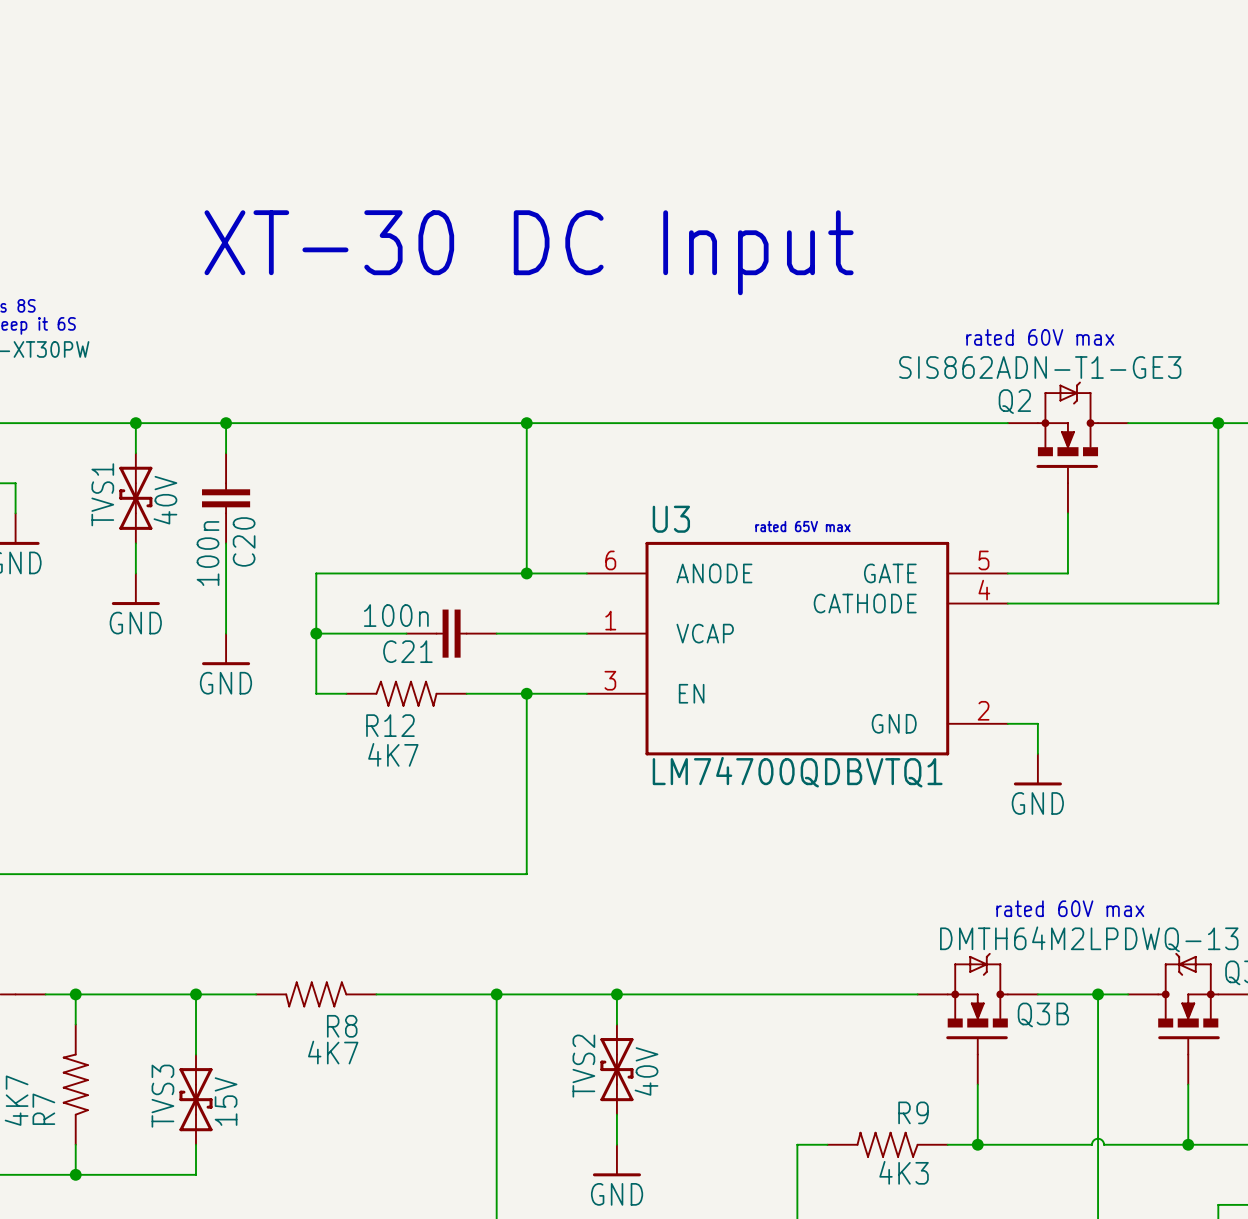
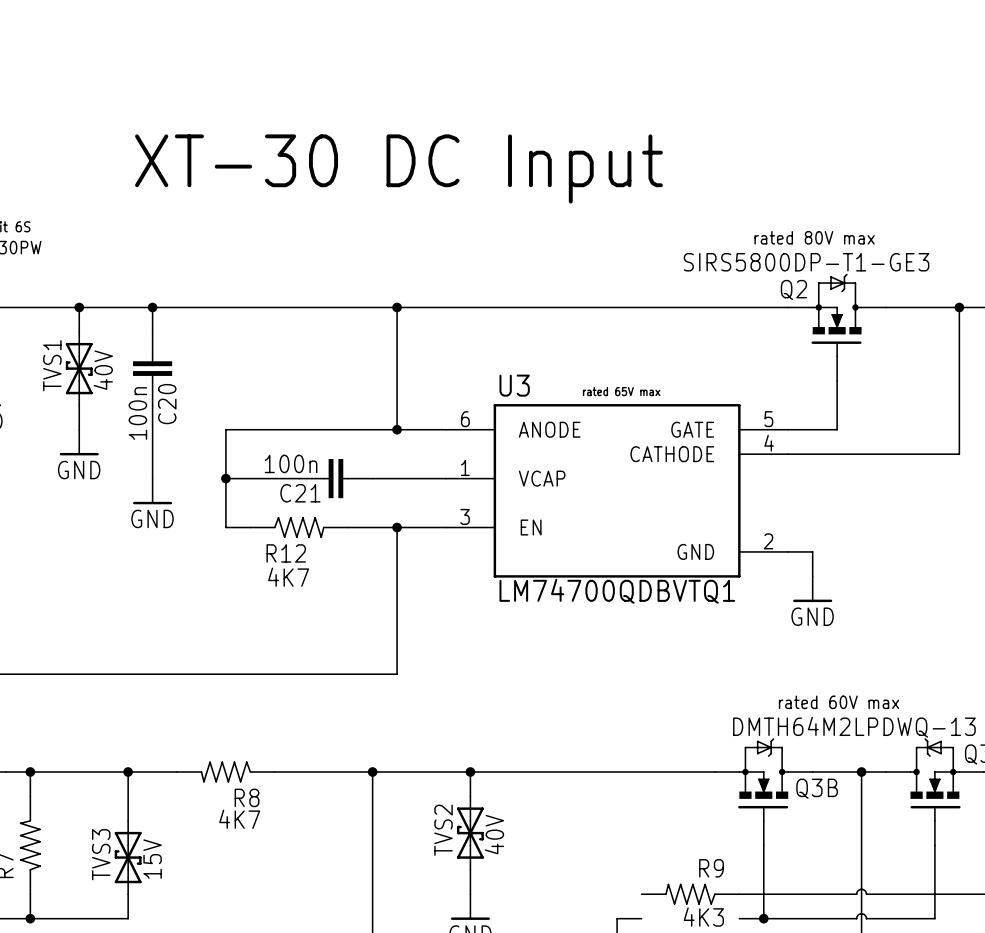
text: rated 60V max (1040, 337) -> rated 80V max (814, 237)
Q2 value: SIS862ADN-T1-GE3 (1040, 367) -> SIRS5800DP-T1-GE3 (806, 262)
wire: (827, 1144) (797, 1144) (797, 1174) -> (641, 918) (617, 918)
wire: none -> (763, 894) (763, 918)
junction position: (977, 1144) -> (763, 918)
wire: none -> (934, 894) (934, 918) (866, 918) (861, 913) (856, 918) (739, 918)
junction: (1188, 1144) -> none

